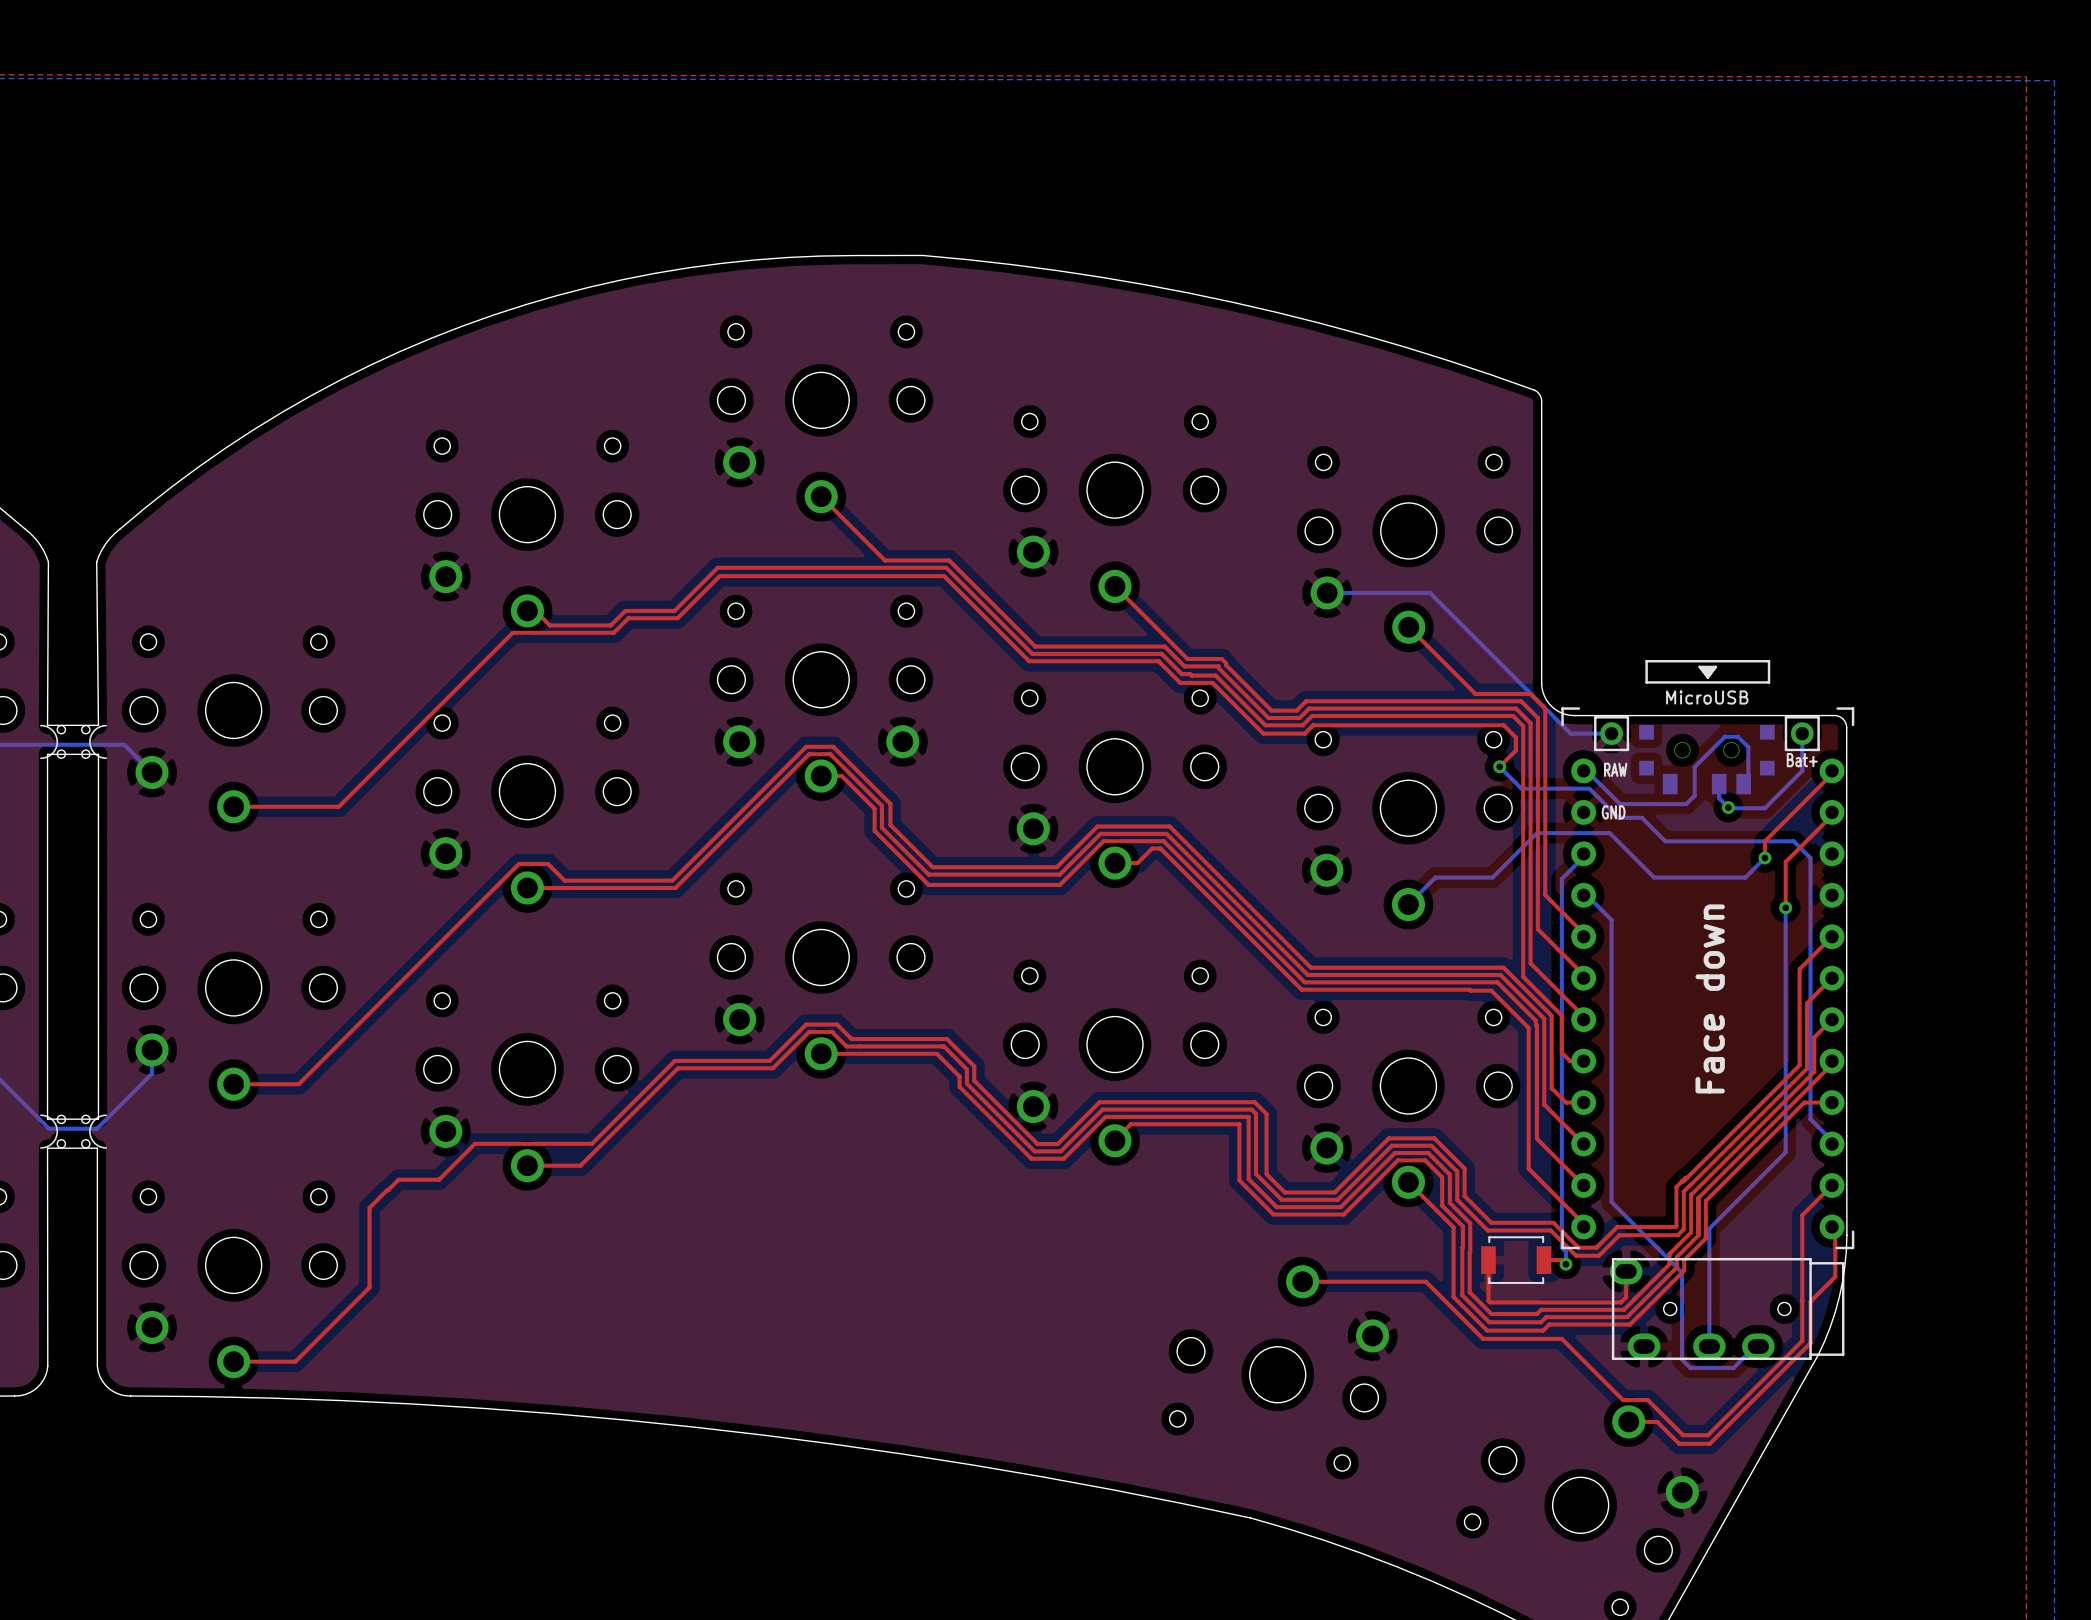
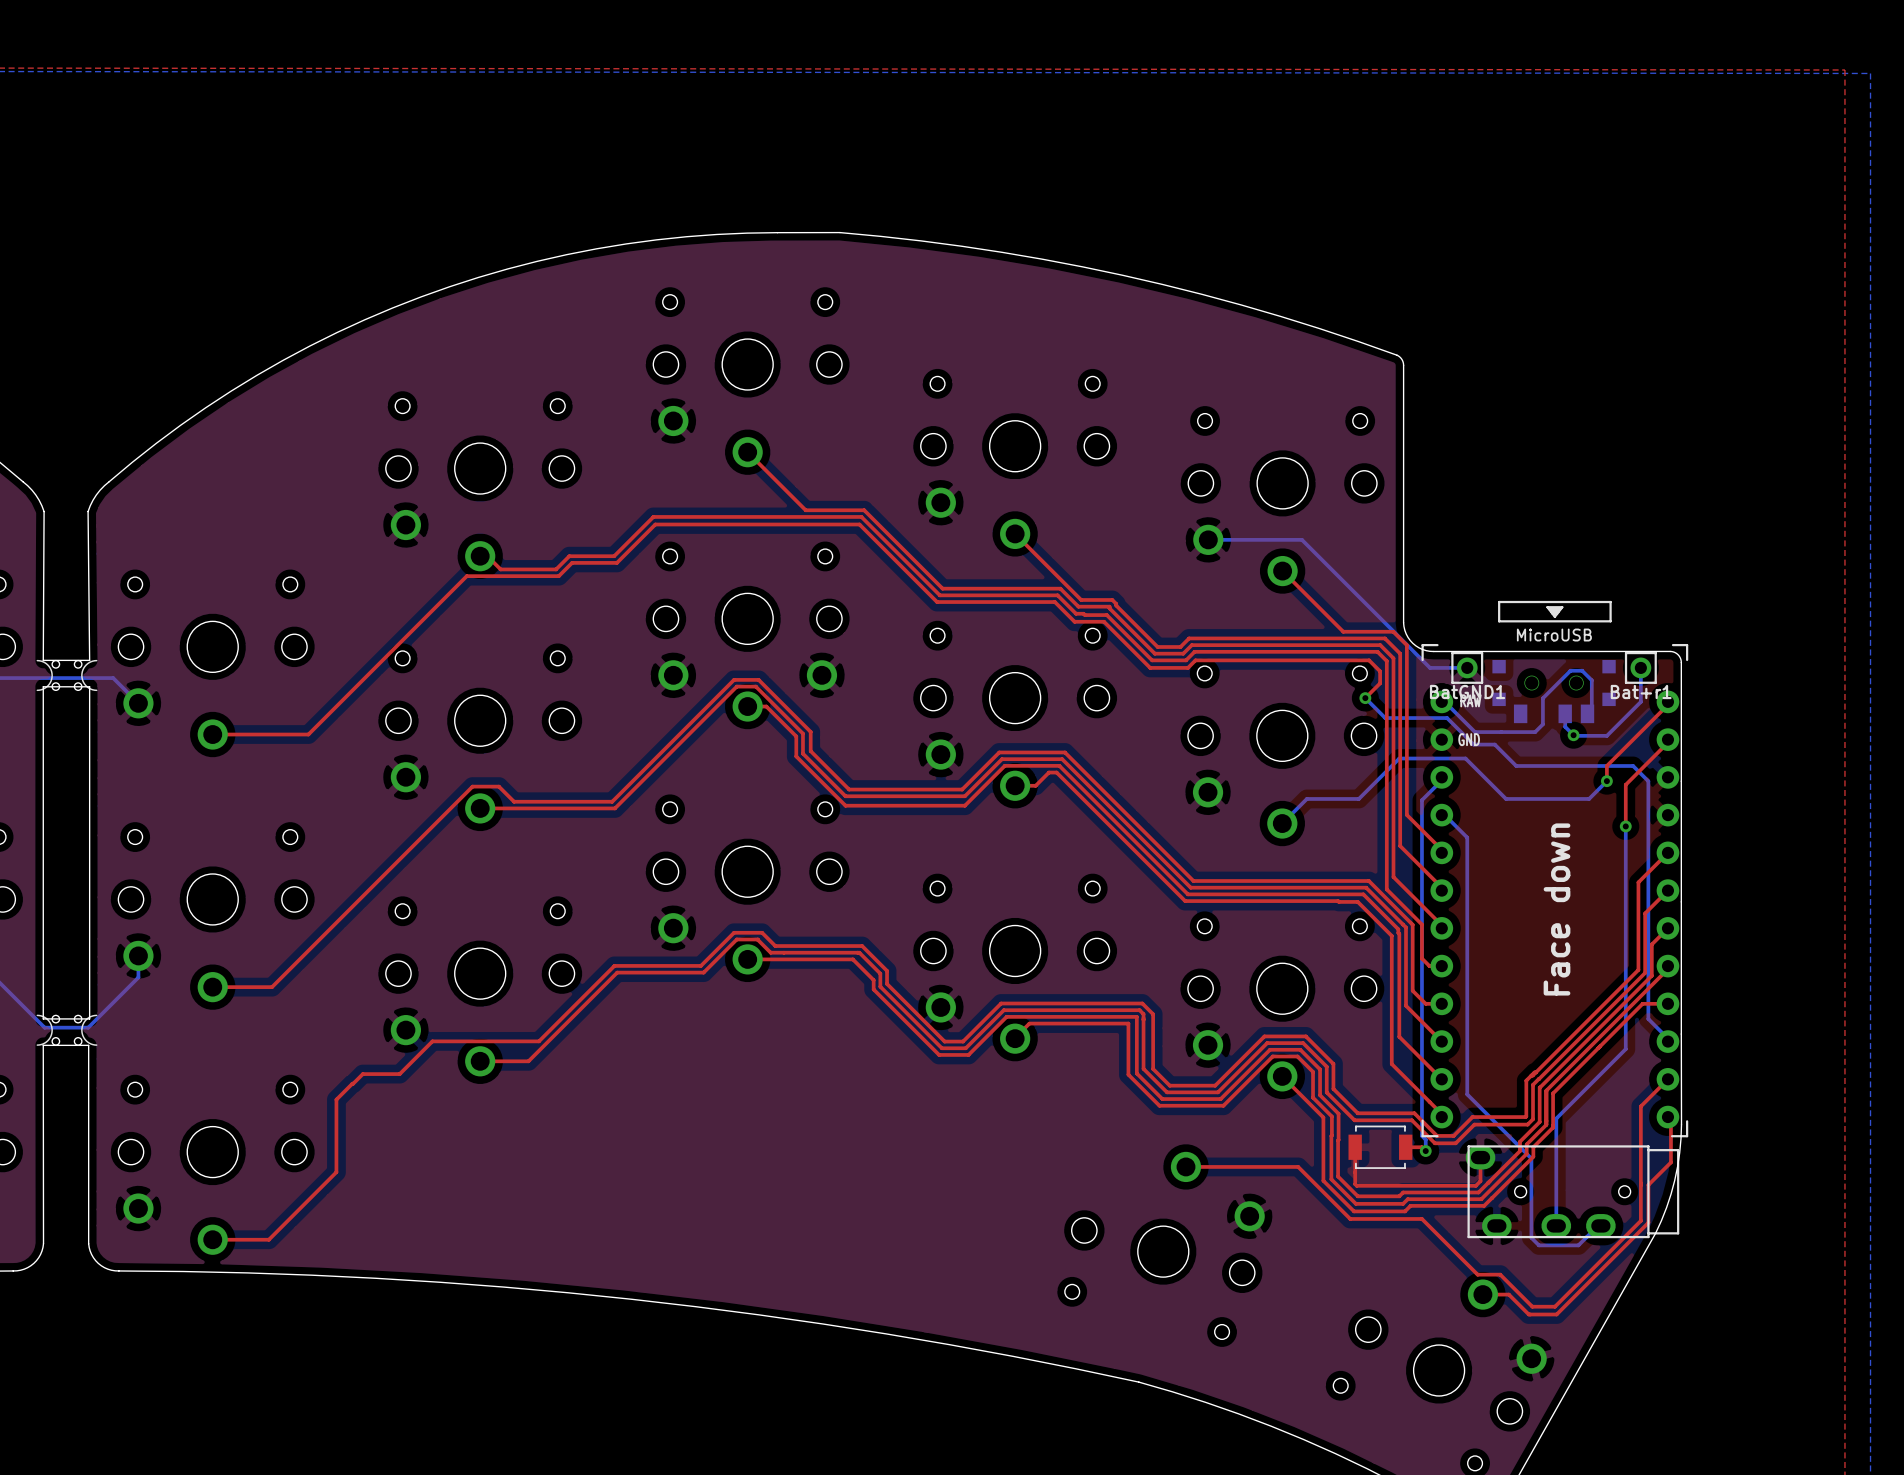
BatGND1 name: none -> BatGND1 (1467, 692)
Bat+ name: Bat+ (1802, 760) -> Bat+r1 (1641, 692)

